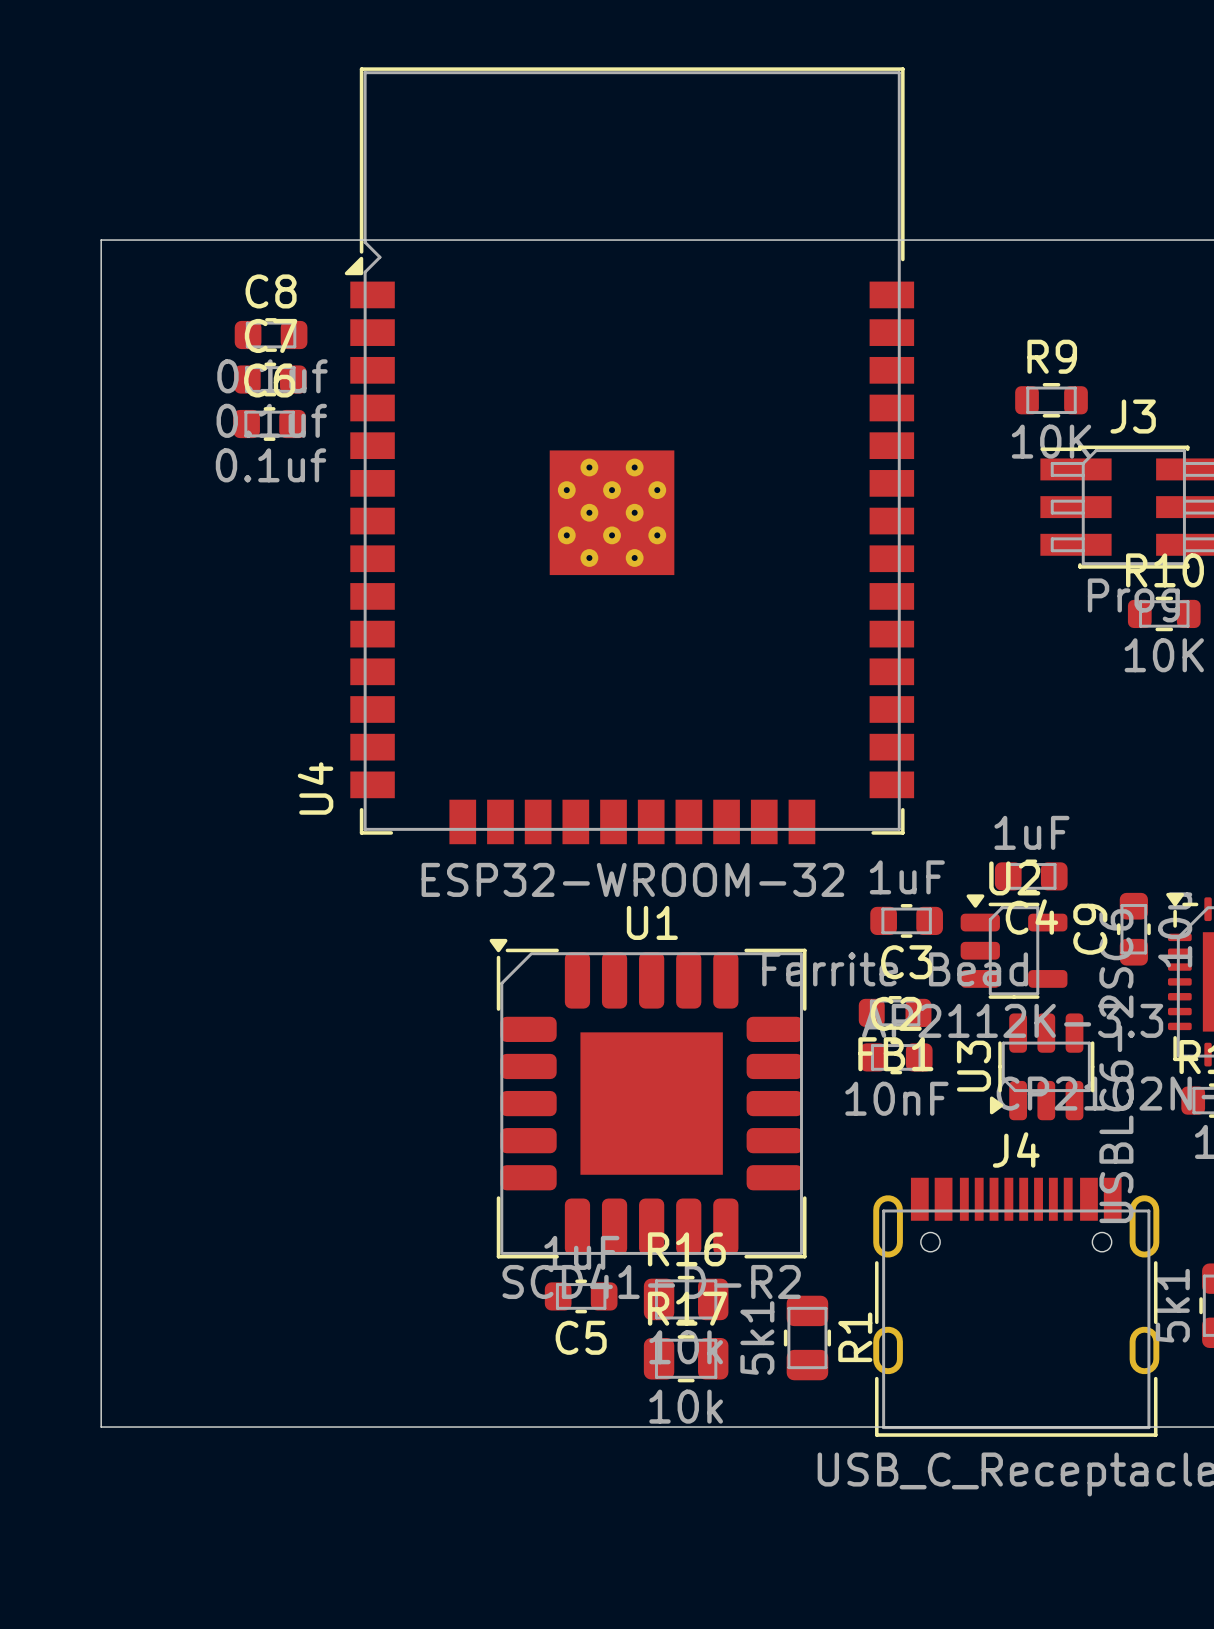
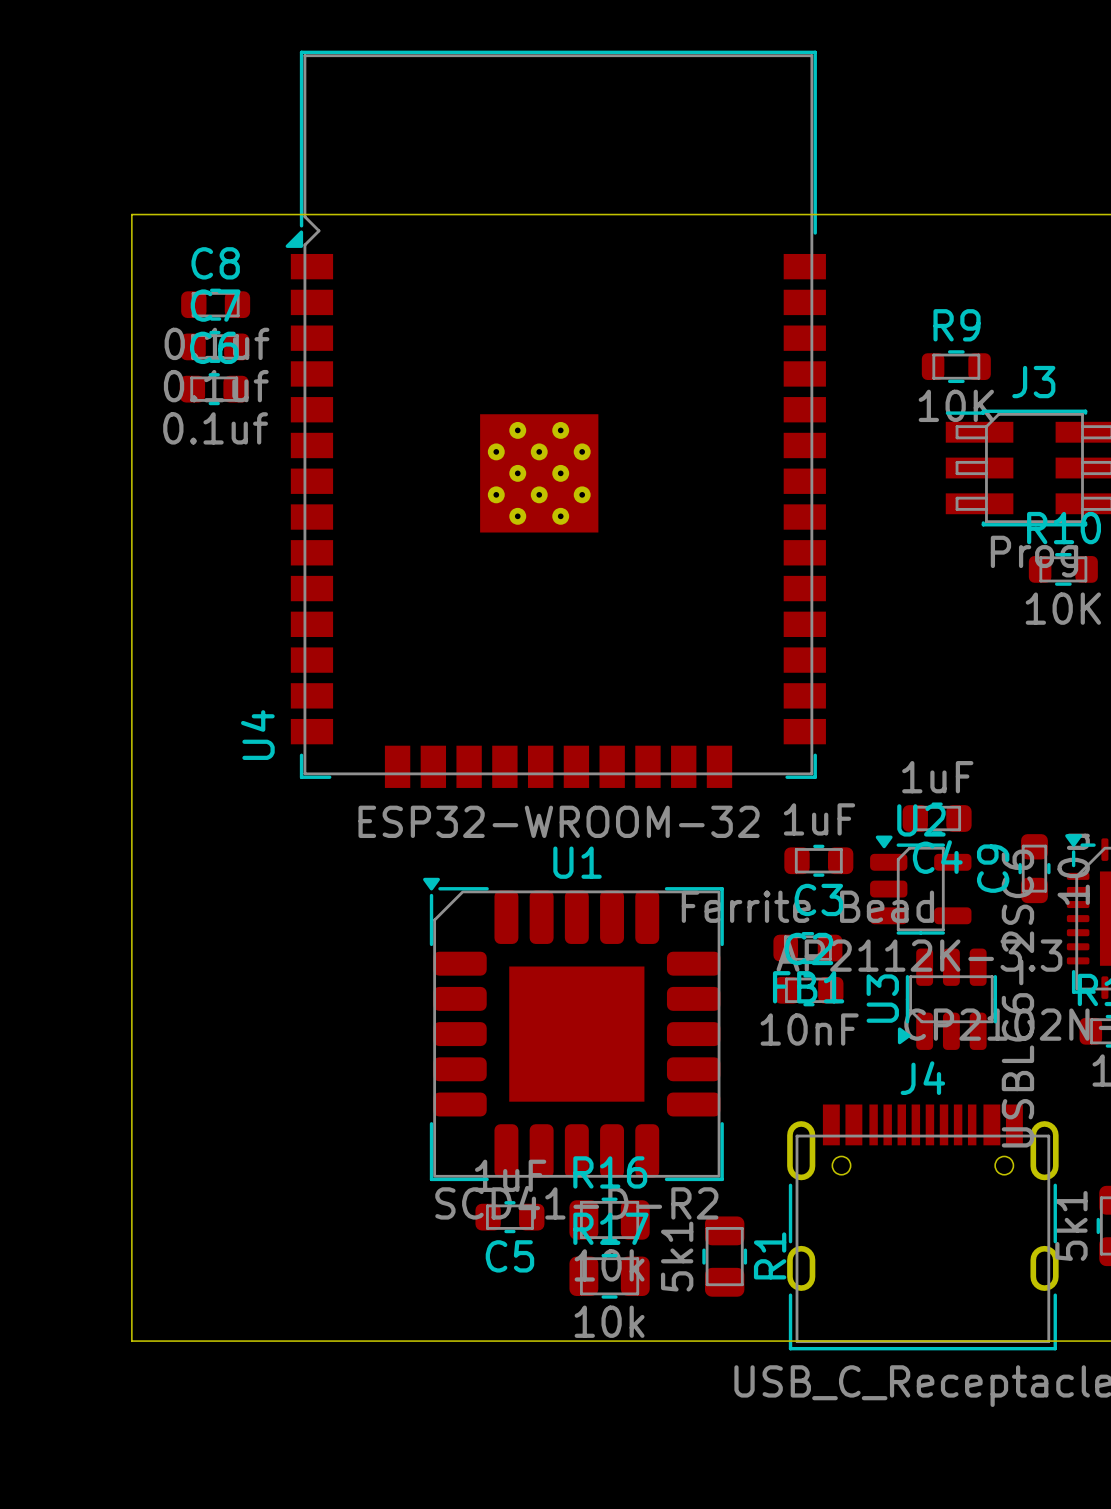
board edge: (182, 240) (101, 240) (101, 1427) (182, 1427) -> (131, 214) (131, 1341)

